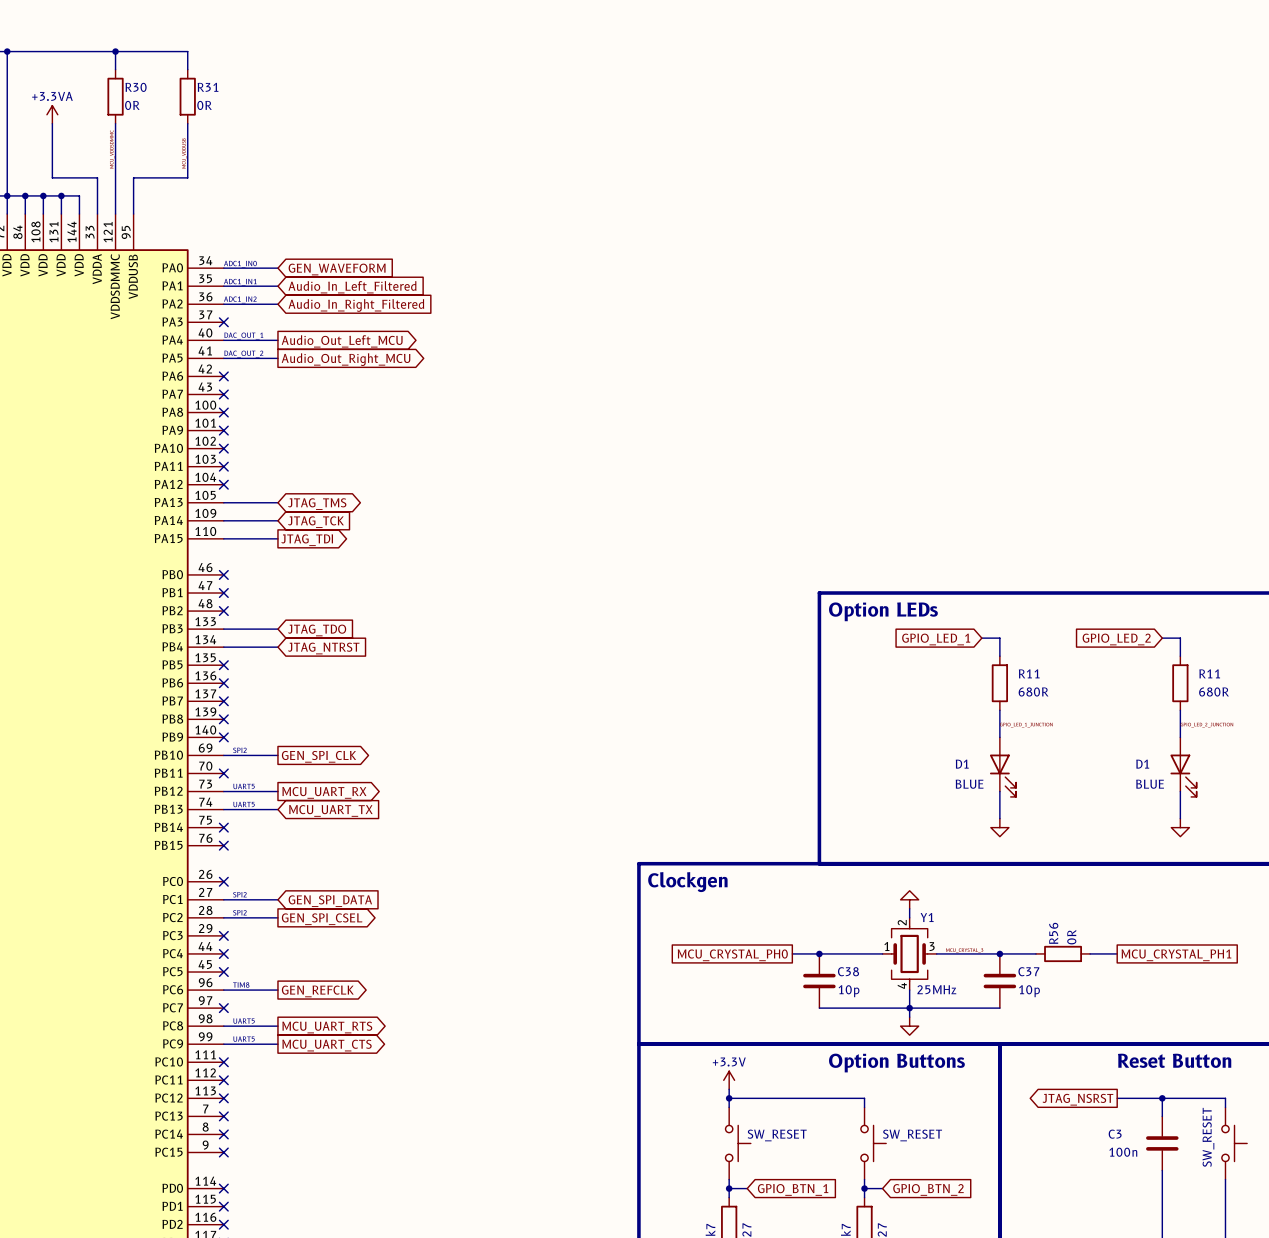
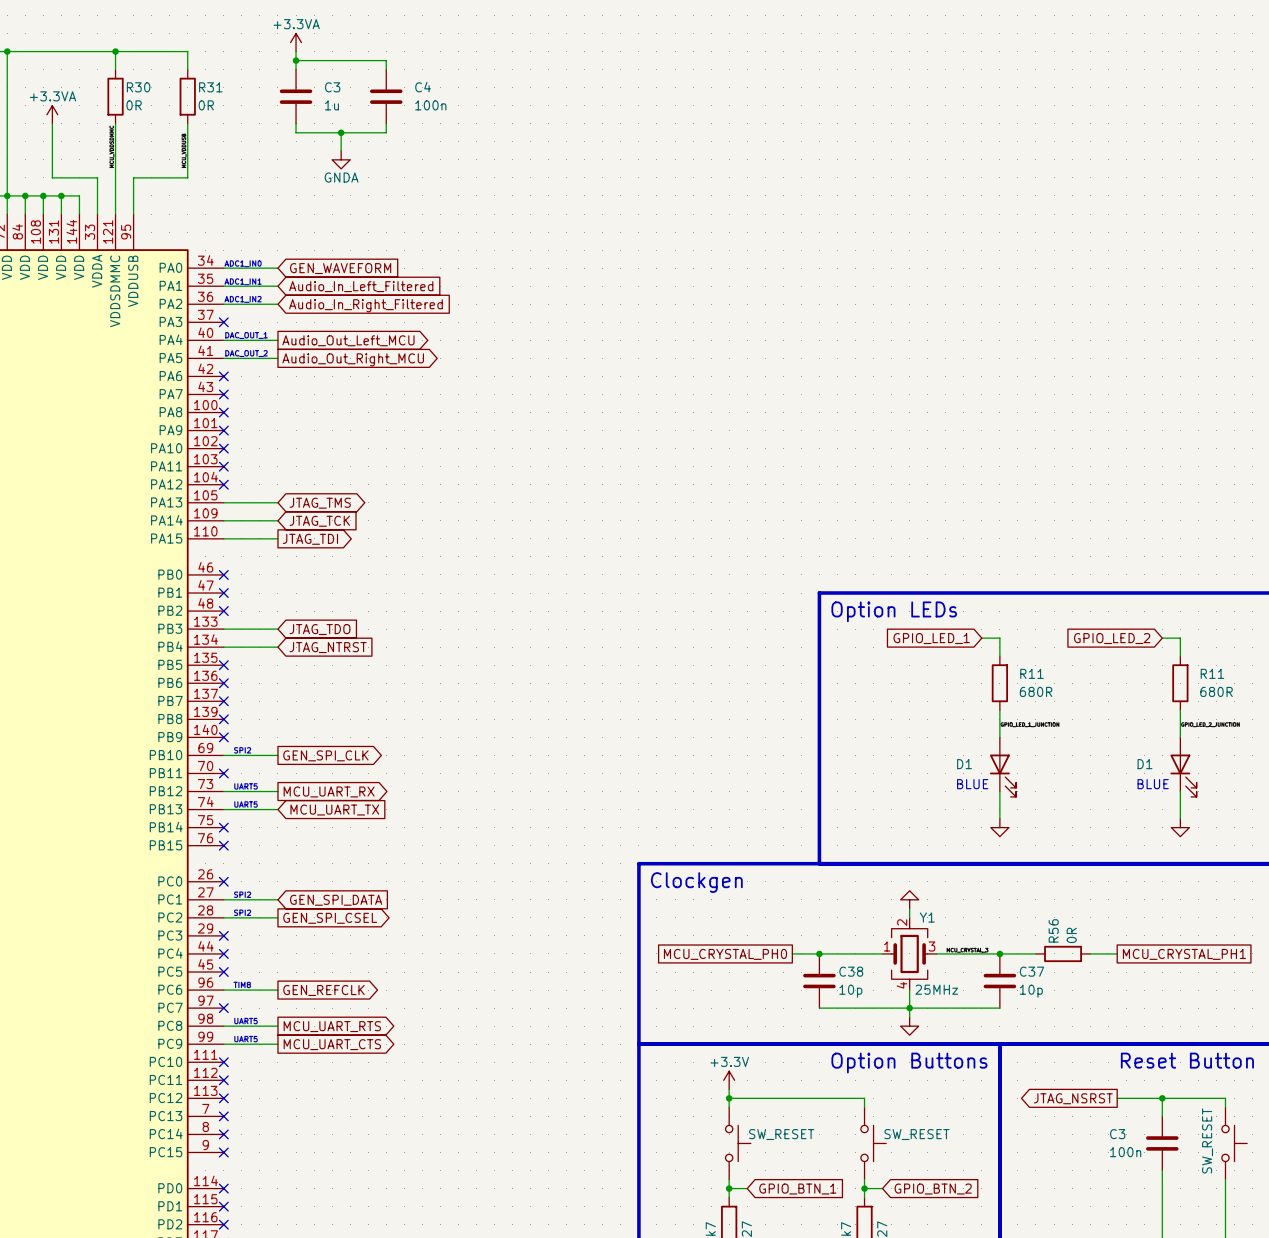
power symbol: none -> +3.3VA (296, 42)
wire: none -> (296, 51) (296, 69)
wire: none -> (296, 60) (386, 60) (386, 69)
junction: none -> (296, 60)
C3: none -> 1u (296, 96)
C4: none -> 100n (386, 96)
wire: none -> (296, 123) (296, 132) (386, 132) (386, 123)
wire: none -> (341, 132) (341, 150)
junction: none -> (341, 132)
power symbol: none -> GNDA (341, 159)

